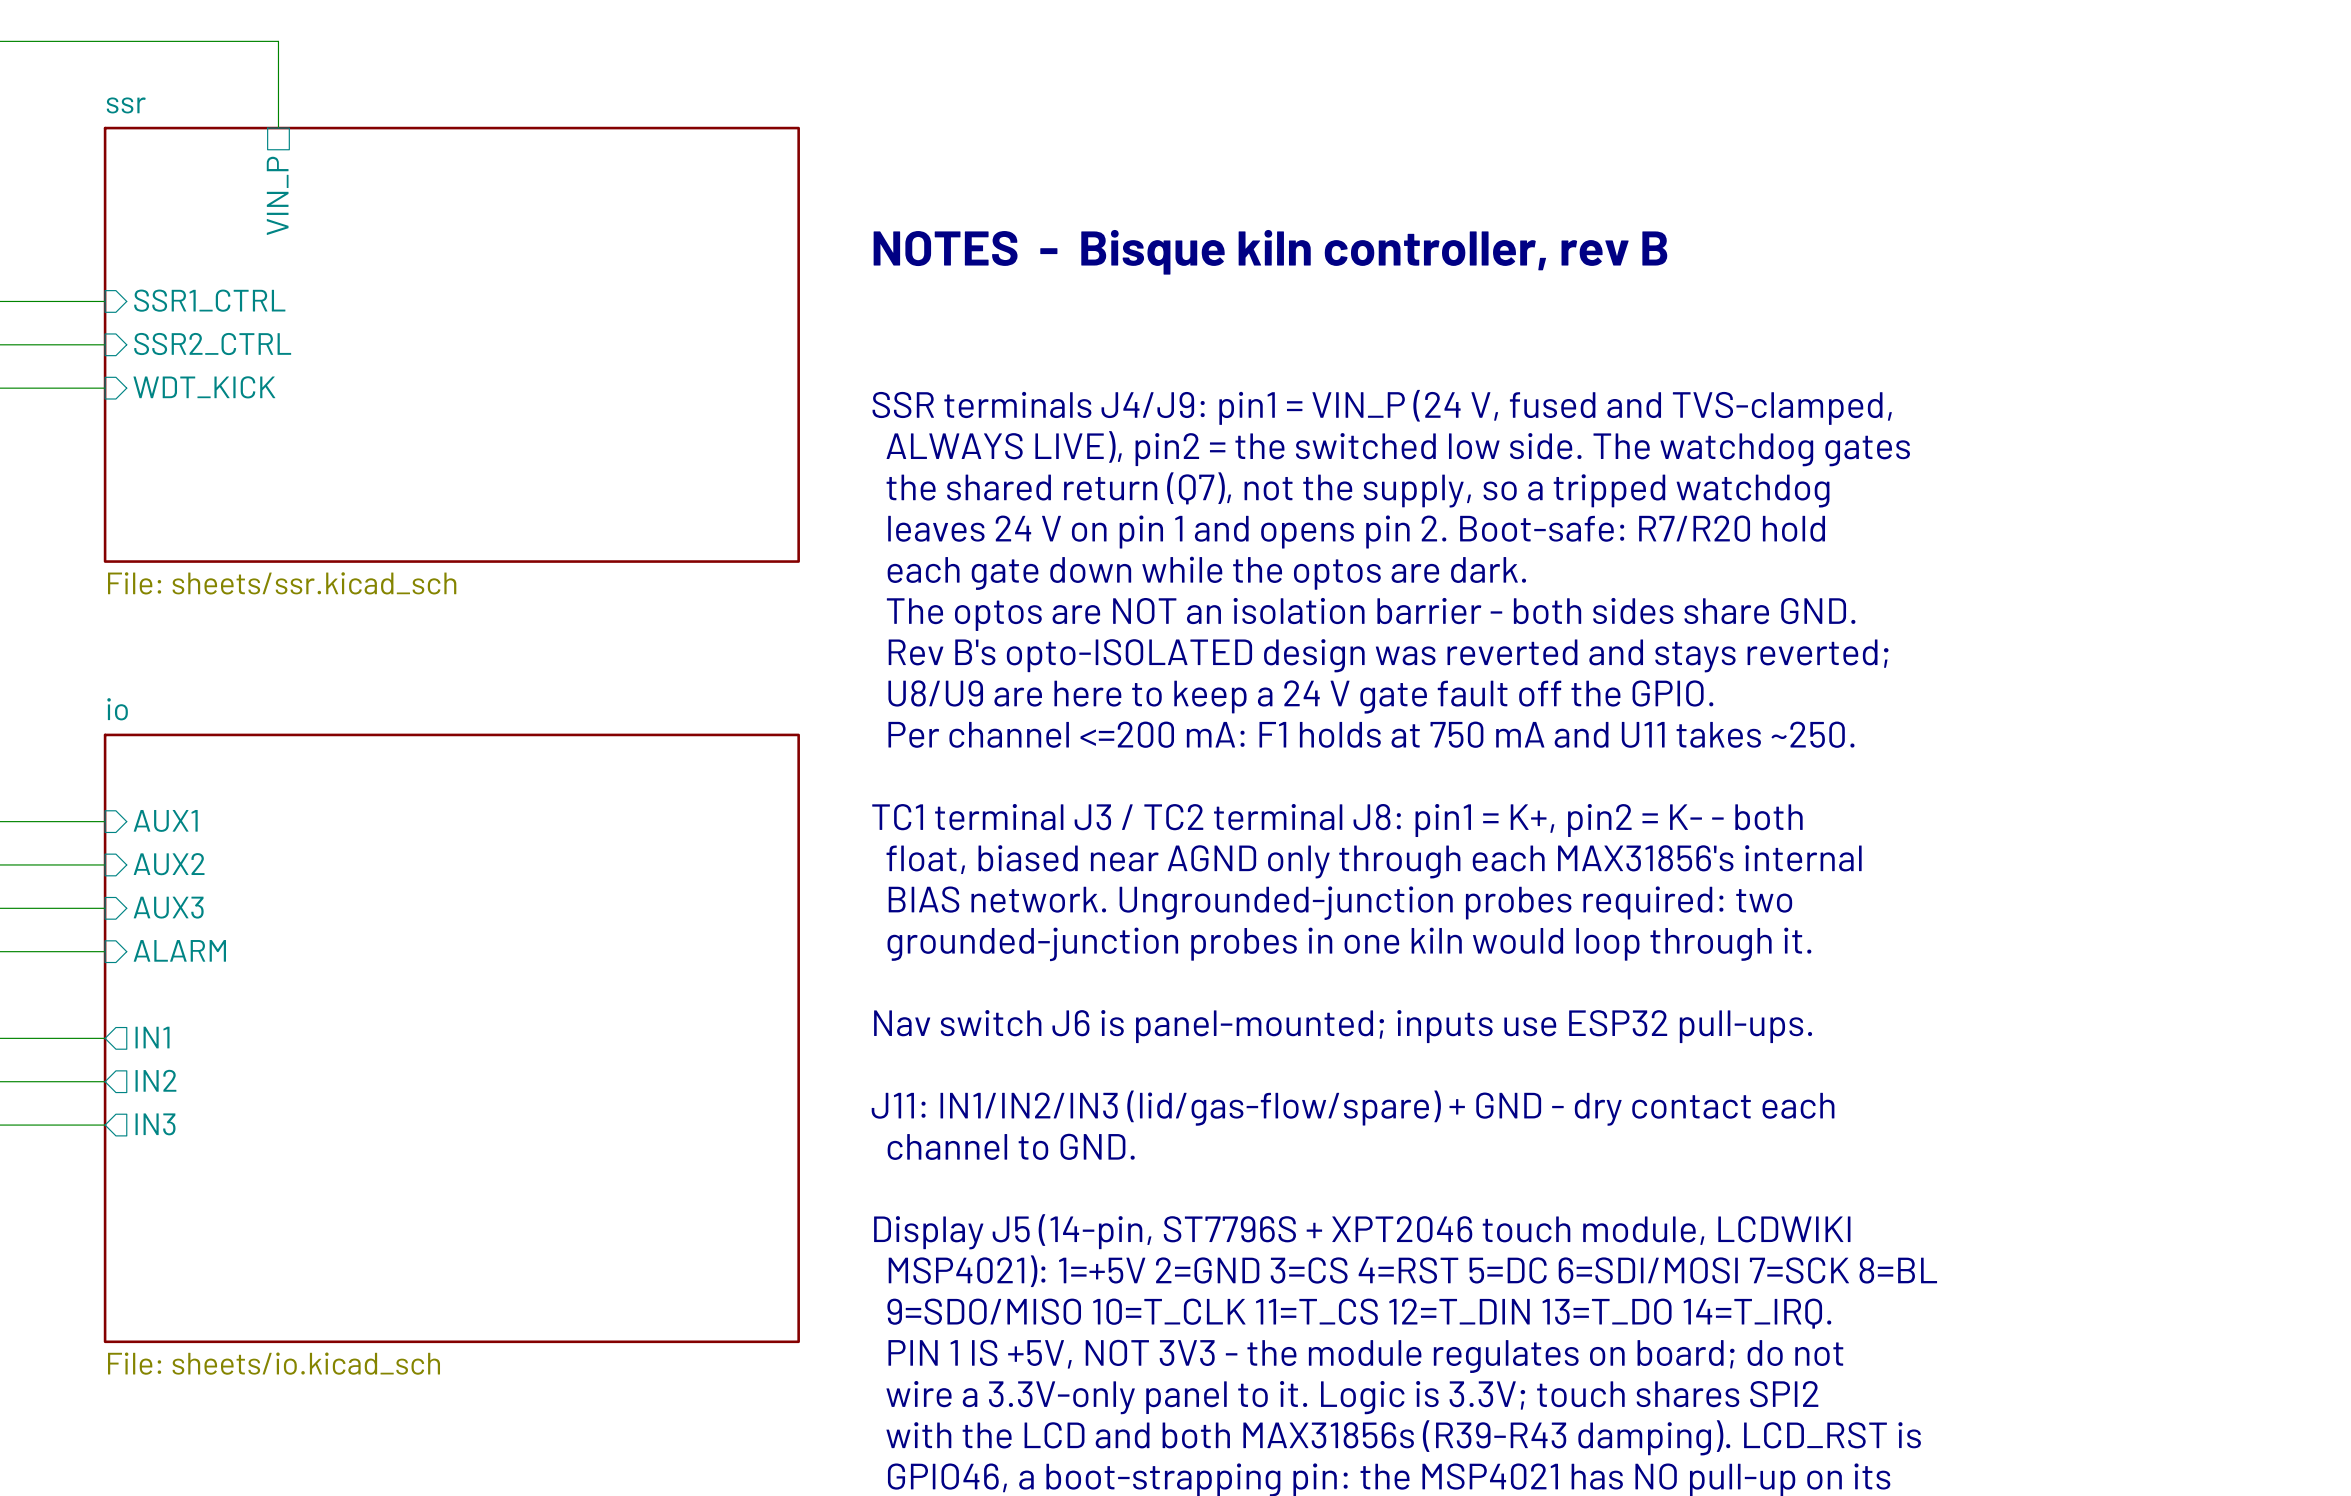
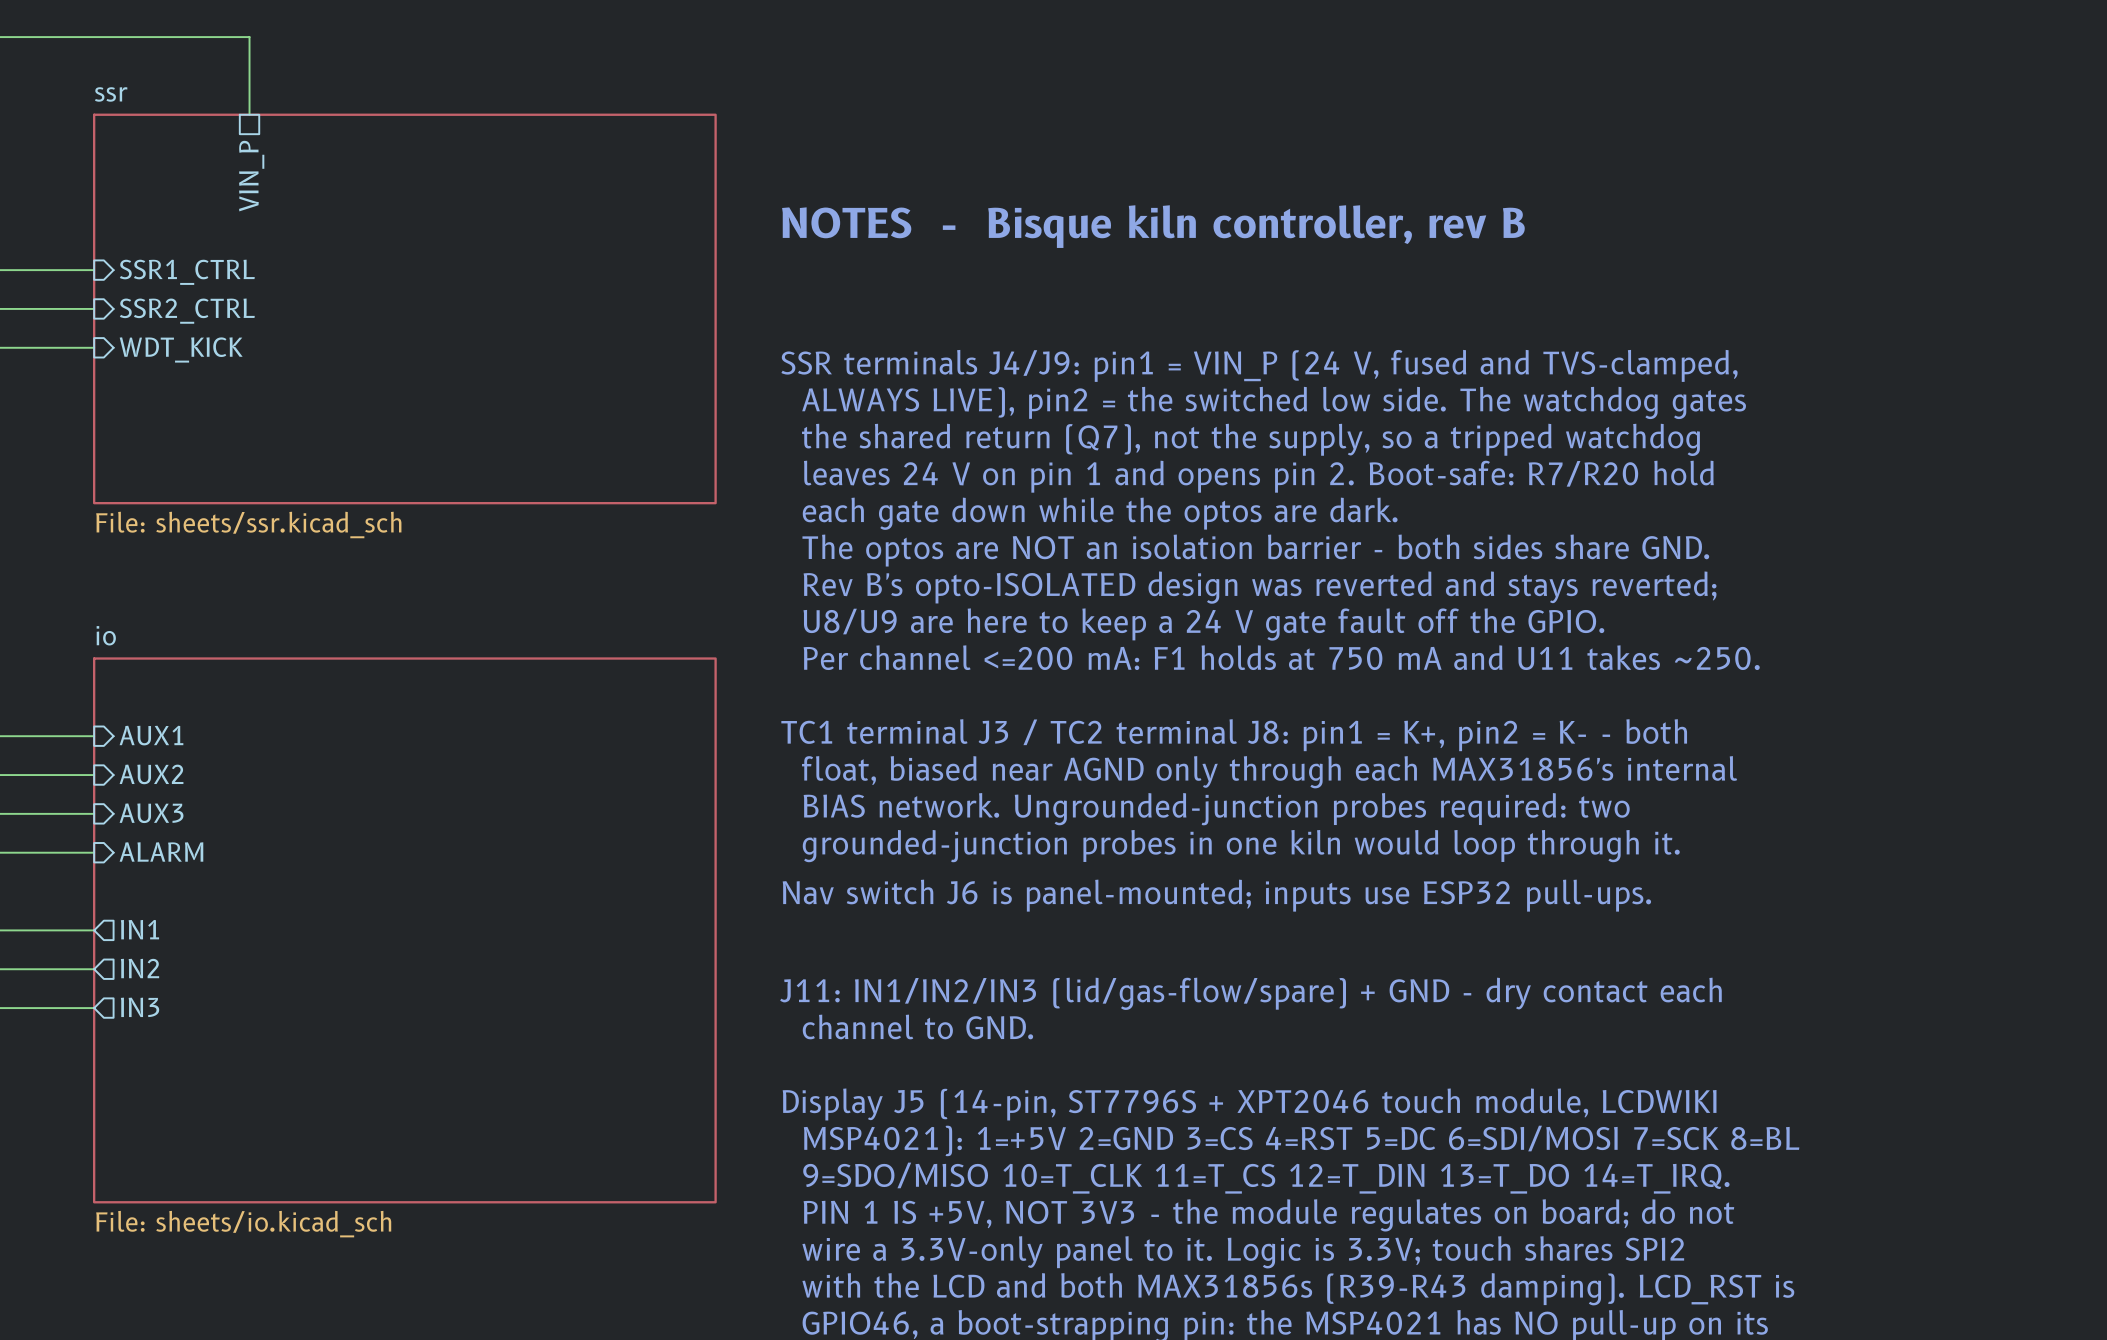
text position: Nav switch J6 is panel-mounted; inputs use ESP32 pull-ups. (1343, 1026) -> Nav switch J6 is panel-mounted; inputs use ESP32 pull-ups. (1216, 895)

